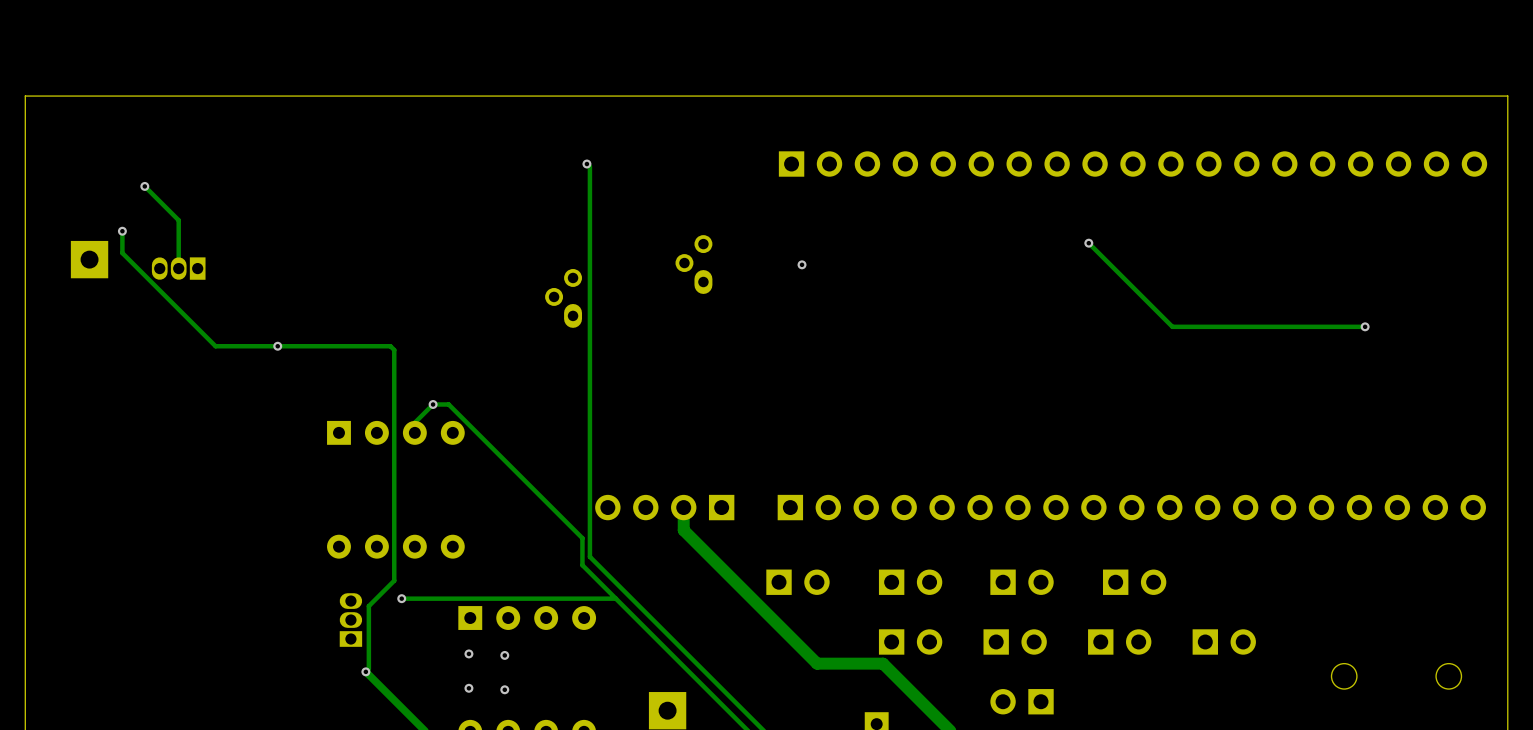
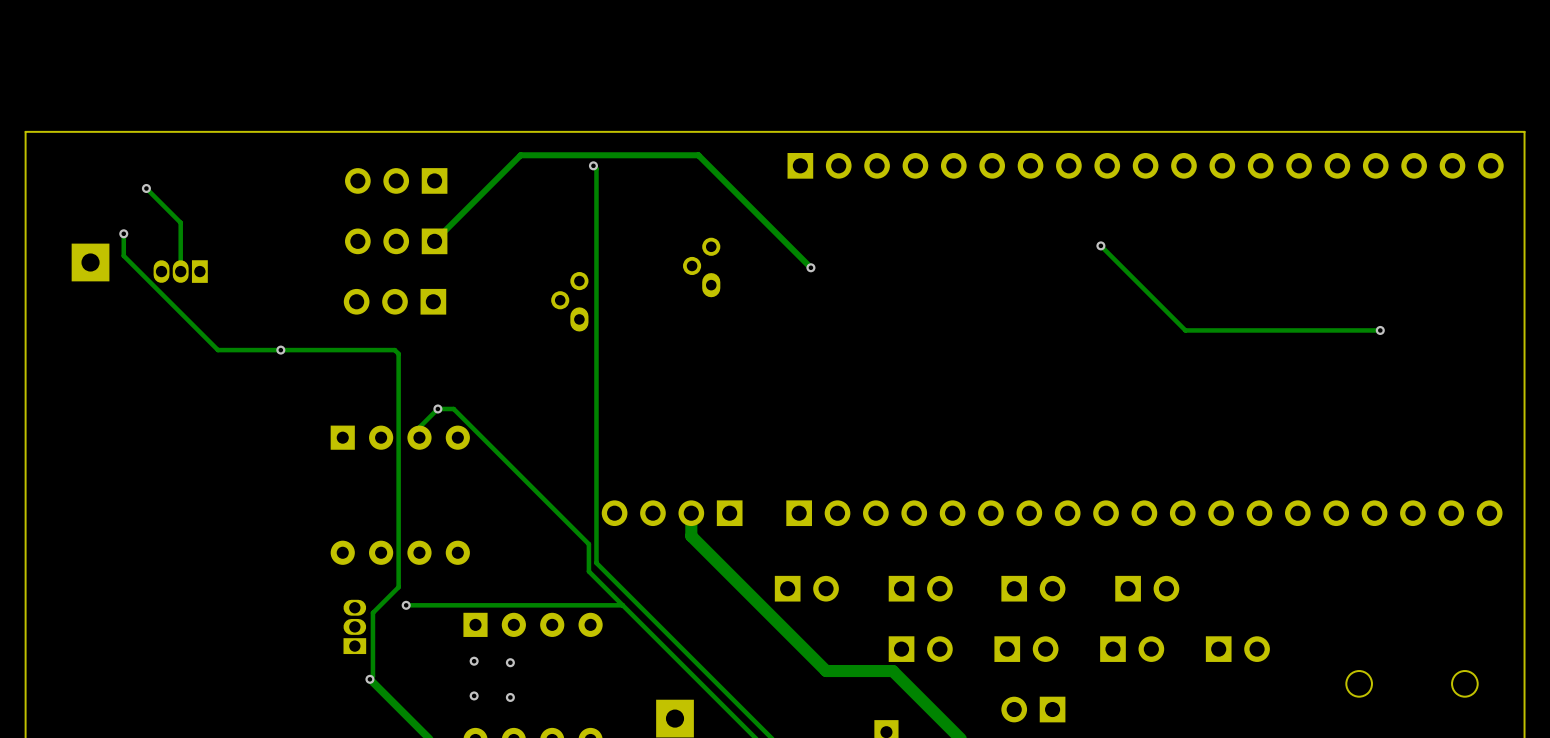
board edge: (1507, 130) (1507, 96) (25, 96) (25, 130) -> (1524, 131) (25, 131)
part: none -> (396, 180)
part: none -> (396, 241)
track: none -> (434, 241) (520, 155) (698, 155) (810, 267)
part: none -> (395, 301)

